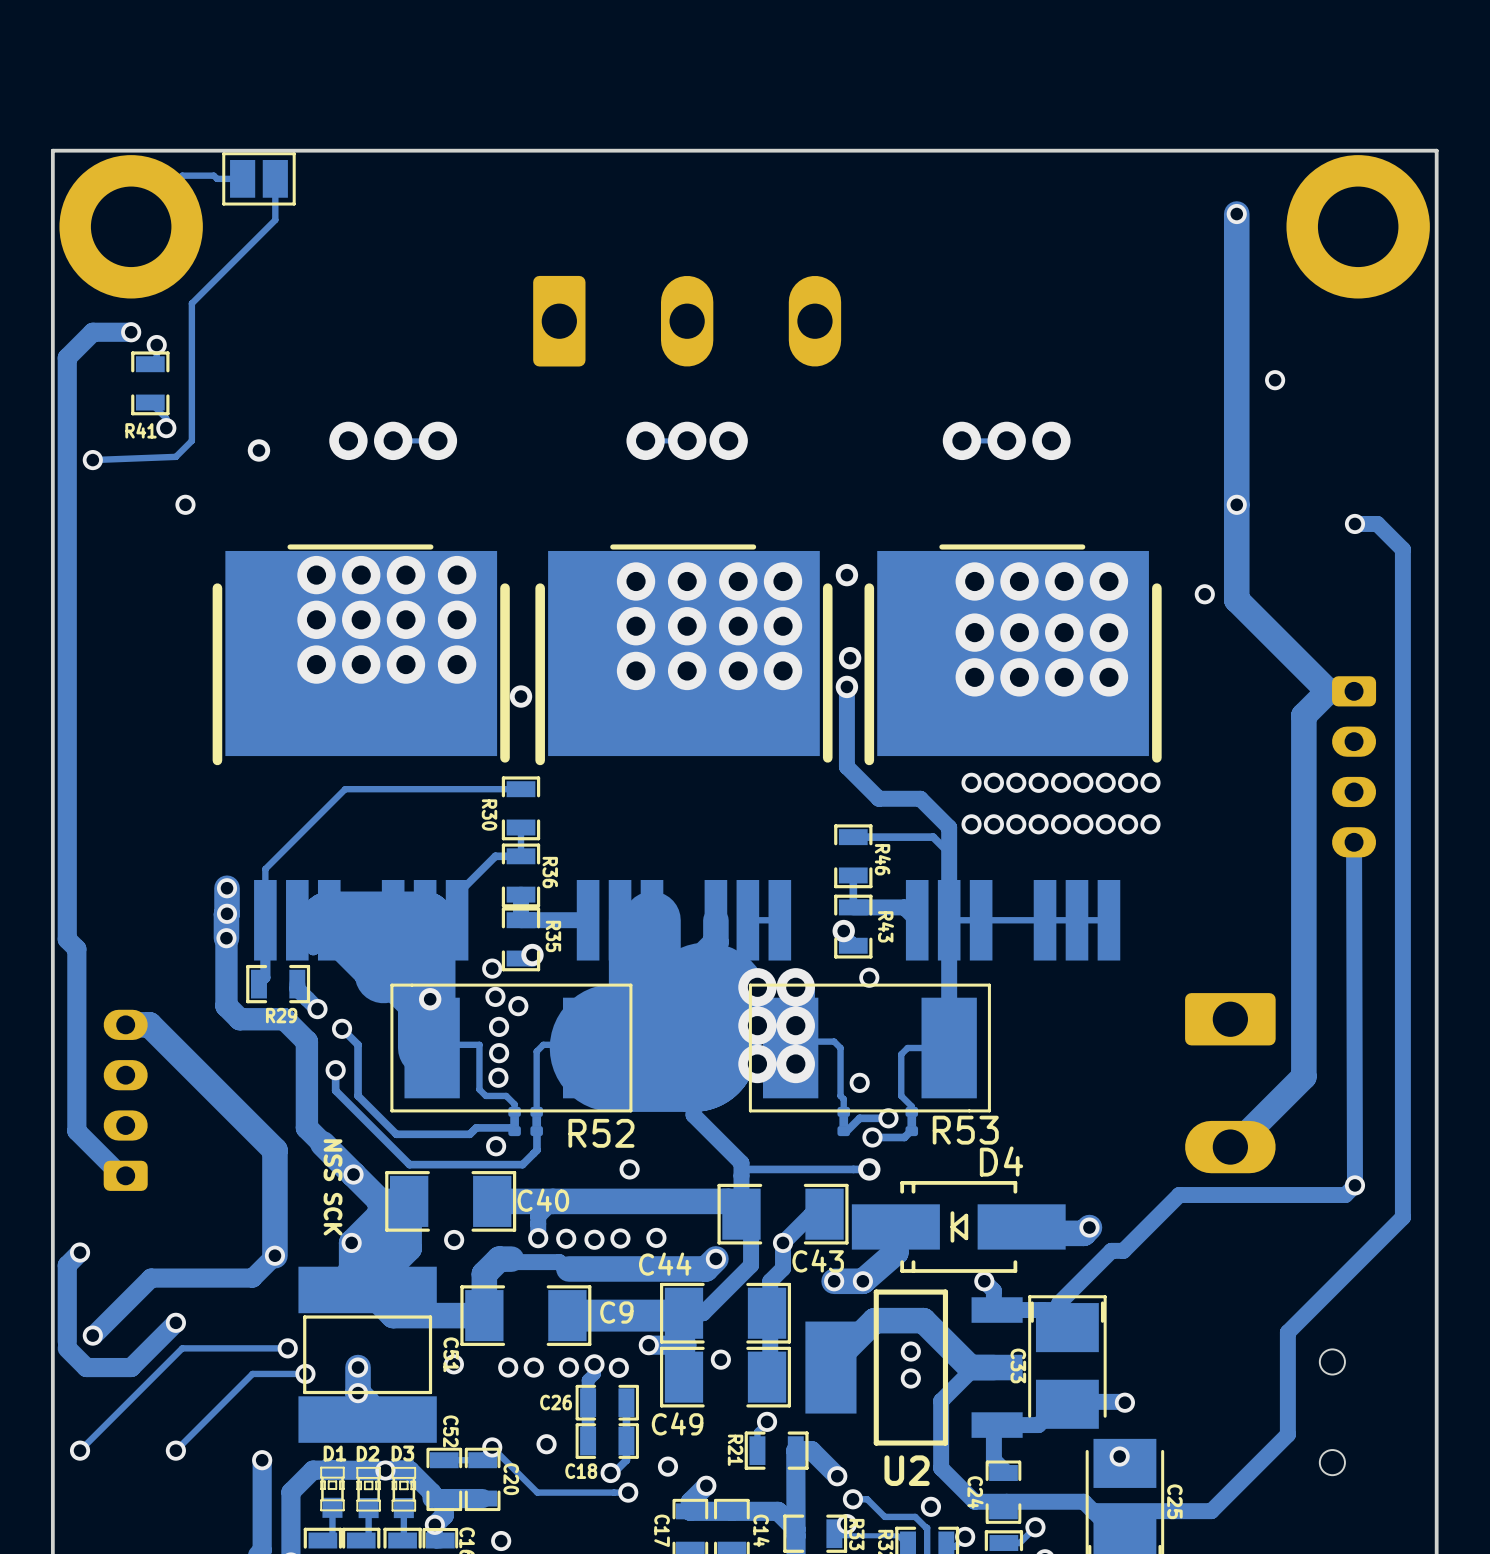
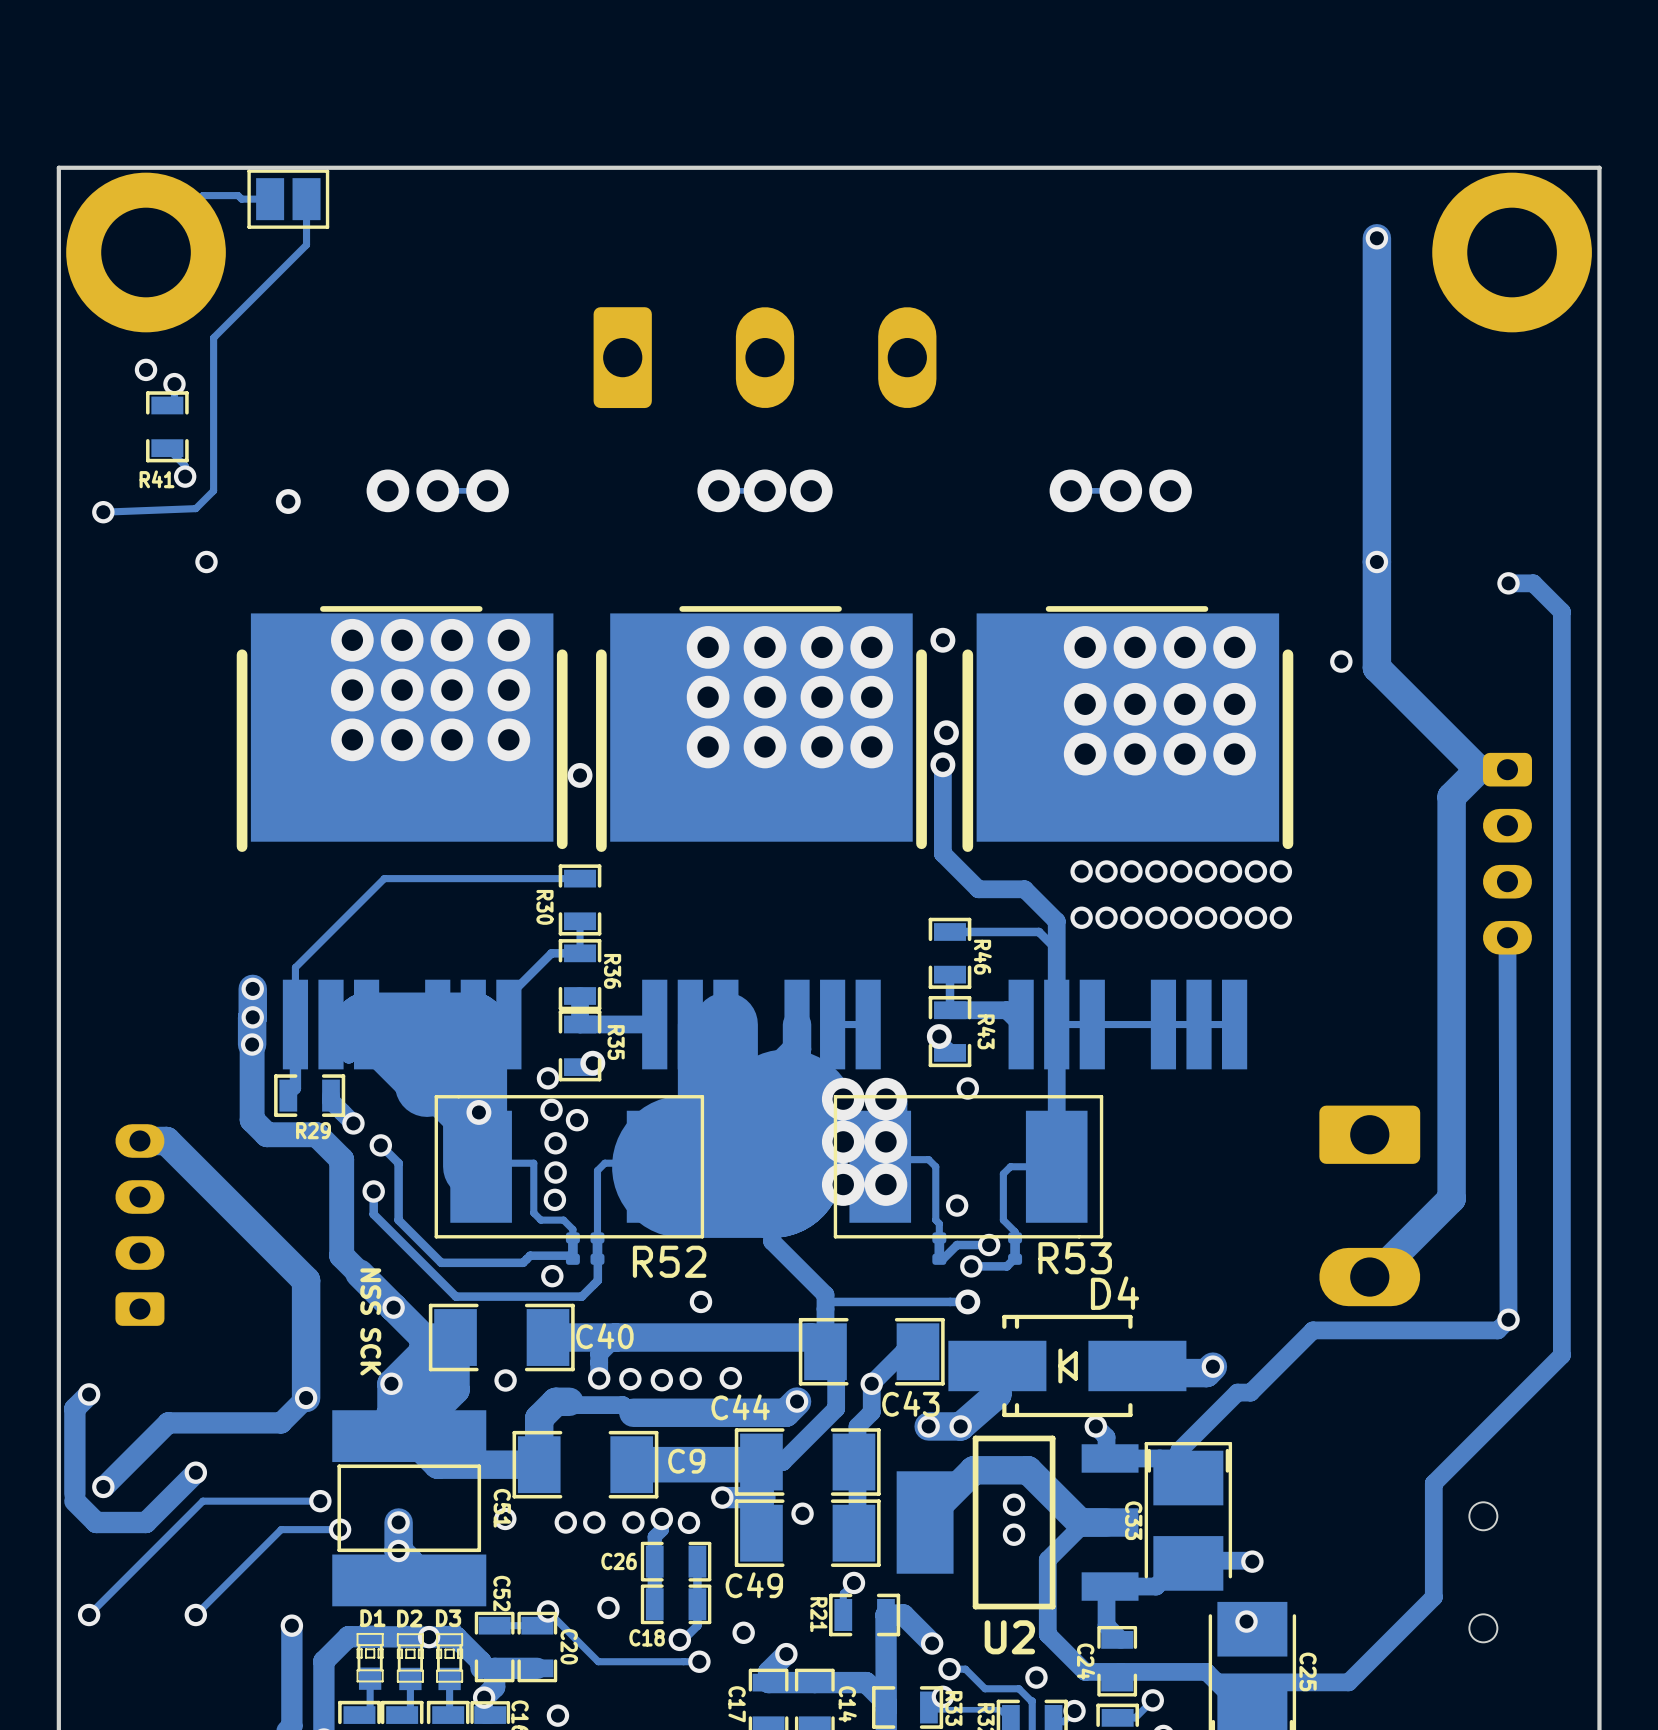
track: (131, 332) (92, 332) (67, 357) (67, 939) (76, 948) (76, 1131) (121, 1175) -> none
via: (1275, 380) -> none

